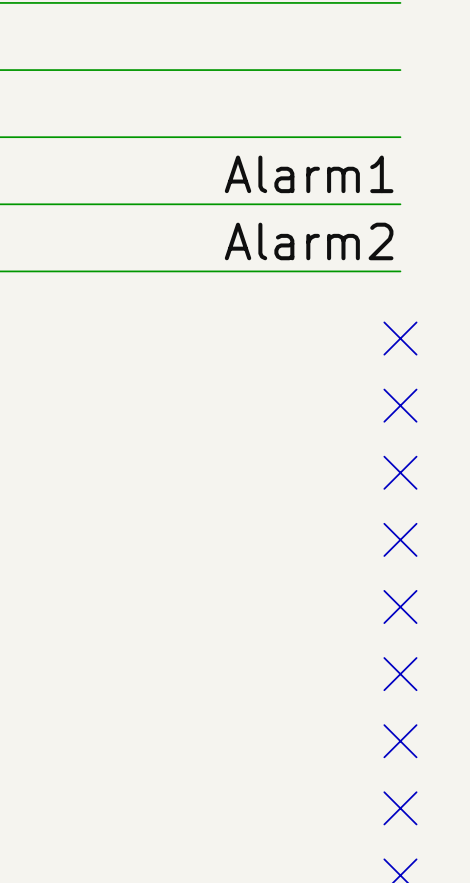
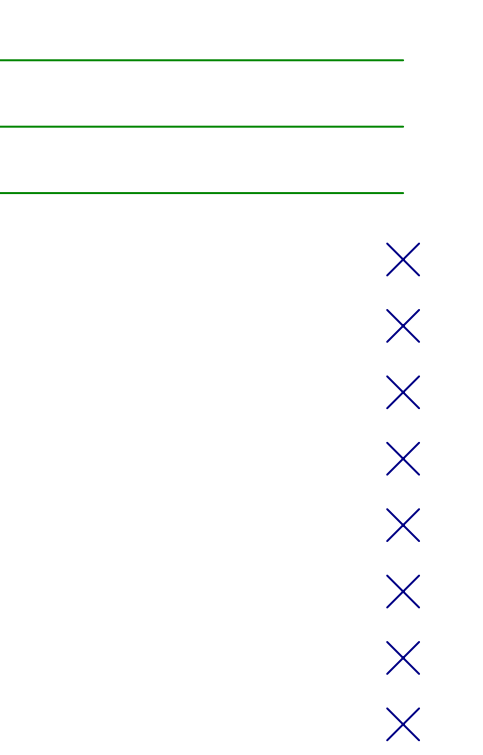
label: Alarm1 (309, 174) -> none
label: Alarm2 (309, 241) -> none

